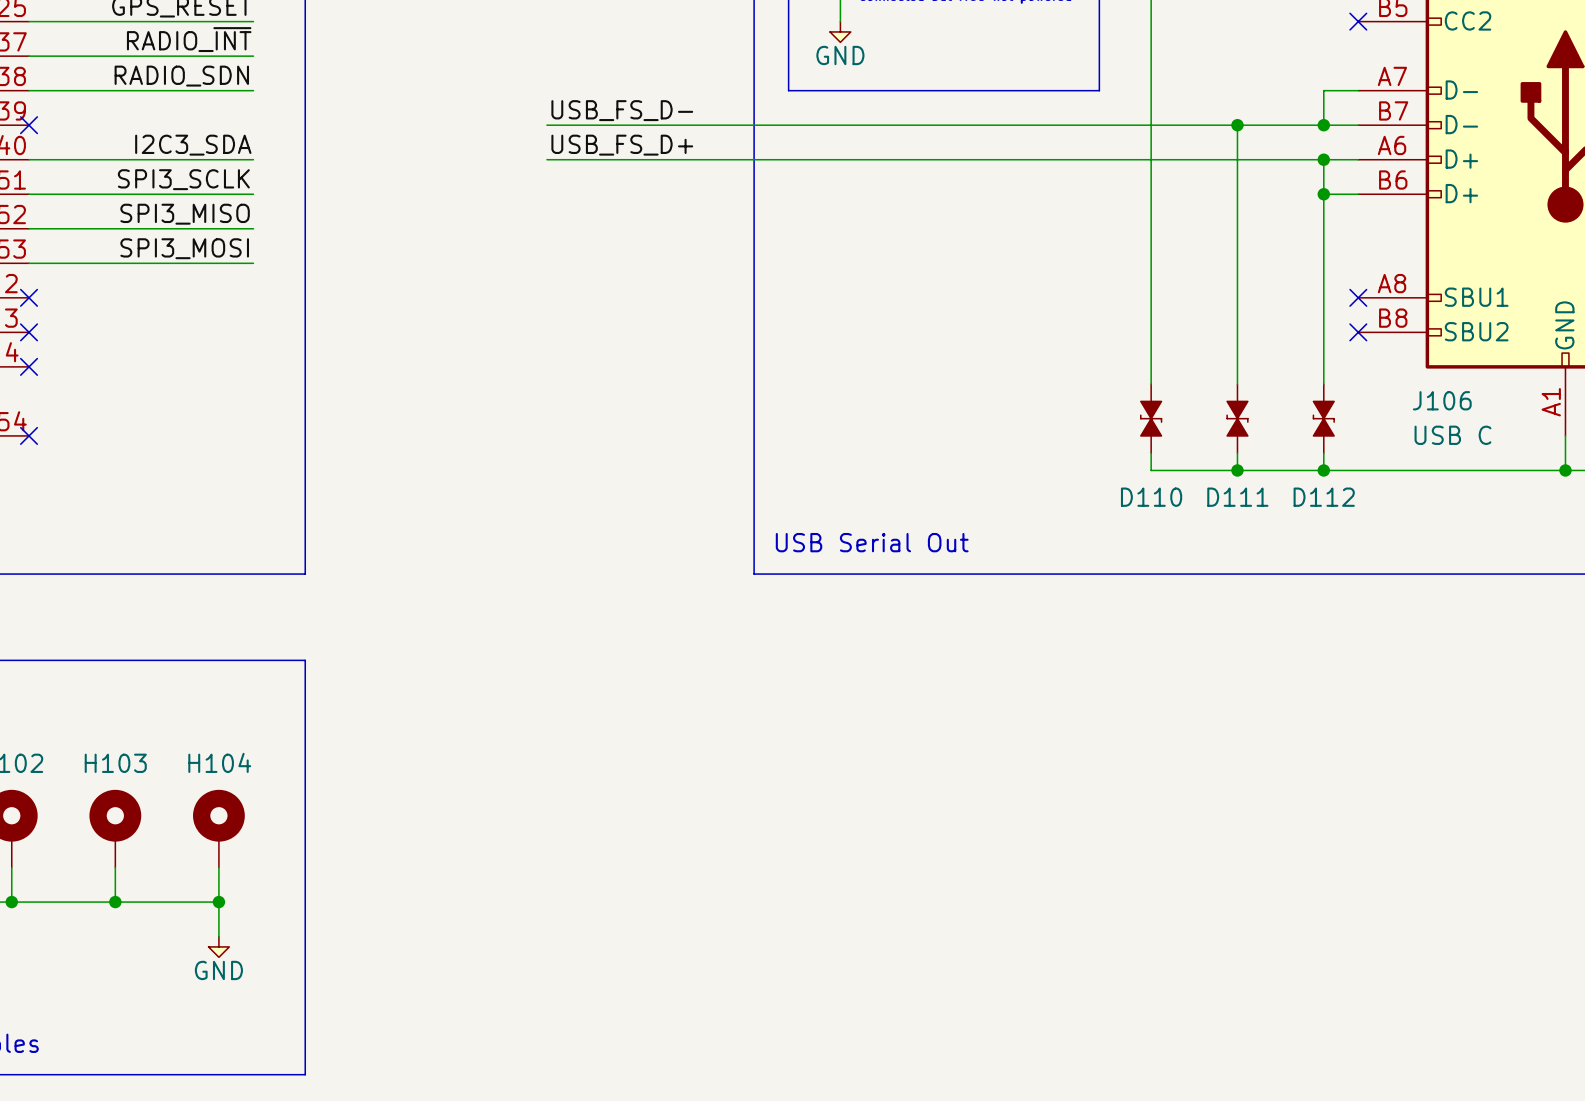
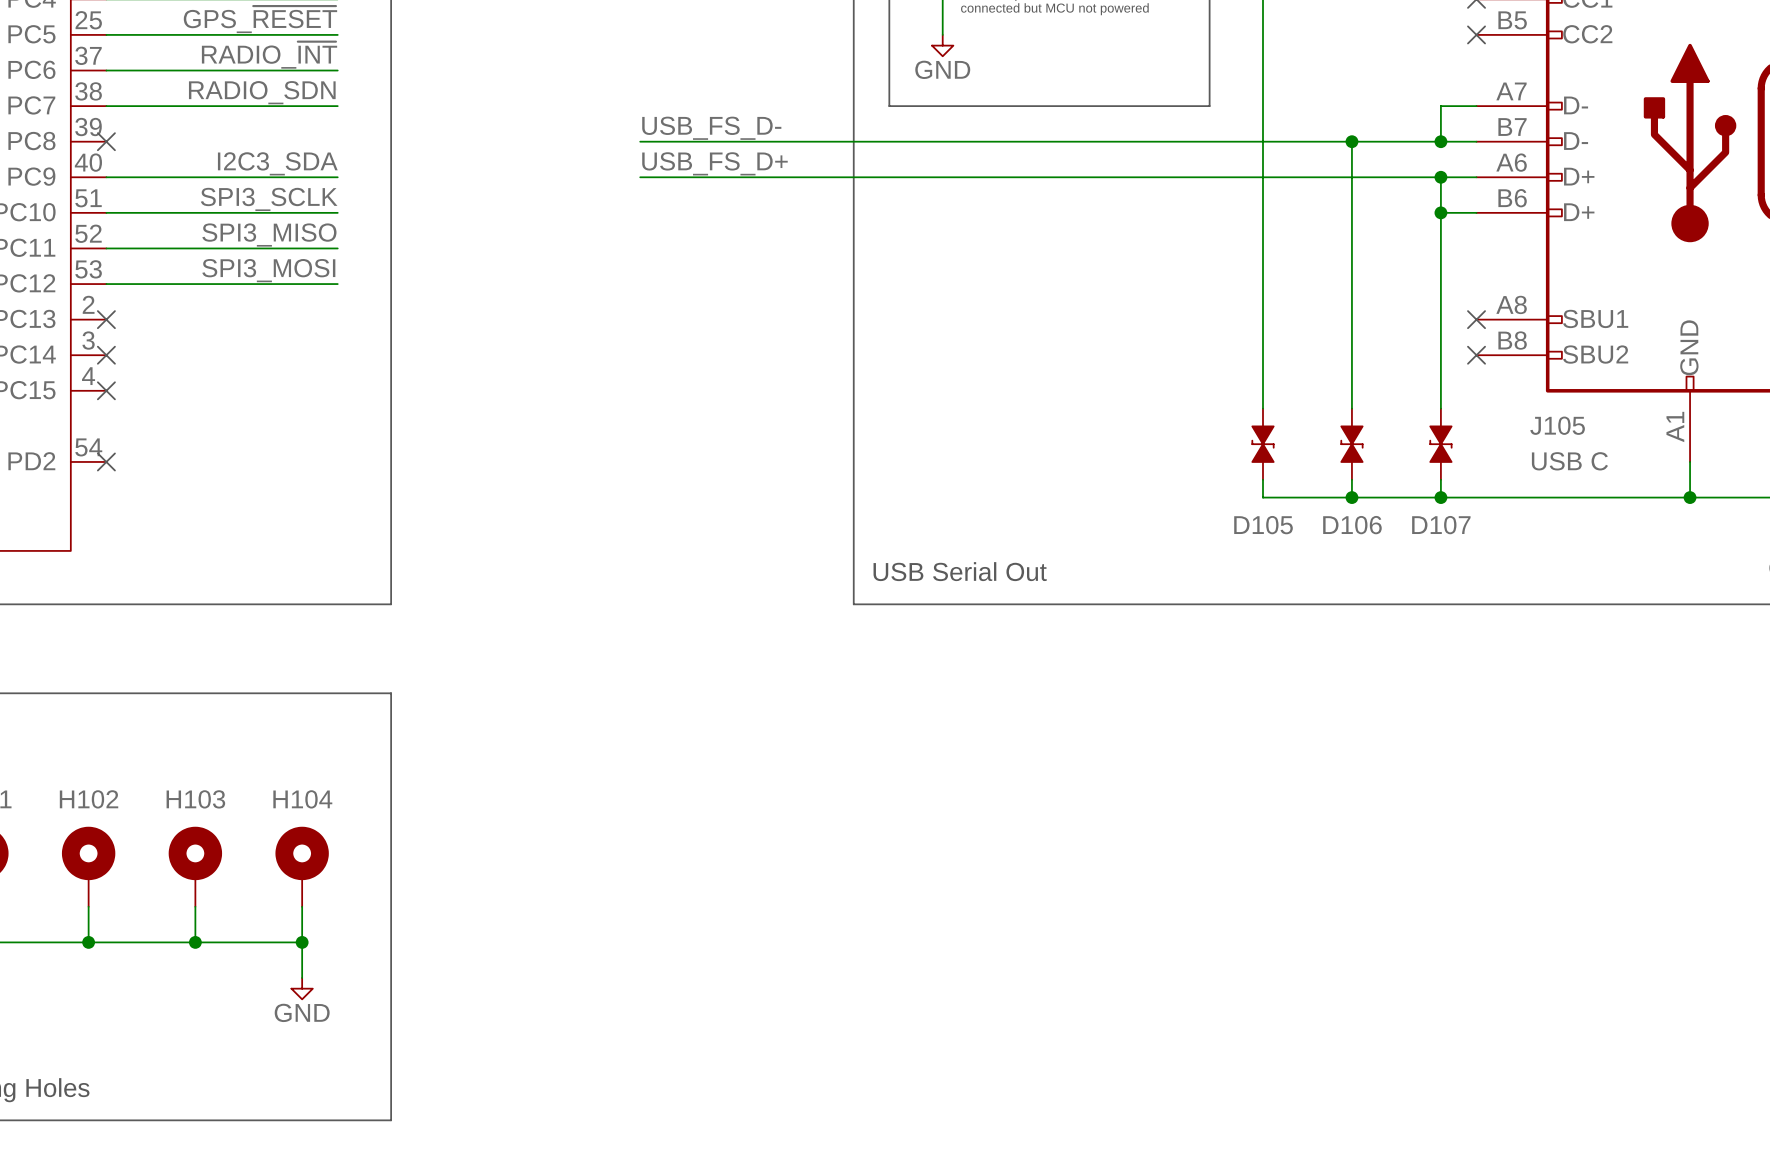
J106 name: J106 (1442, 400) -> J105 (1557, 425)
D110 name: D110 (1151, 497) -> D105 (1263, 525)
D111 name: D111 (1237, 497) -> D106 (1352, 525)
D112 name: D112 (1324, 497) -> D107 (1441, 525)

